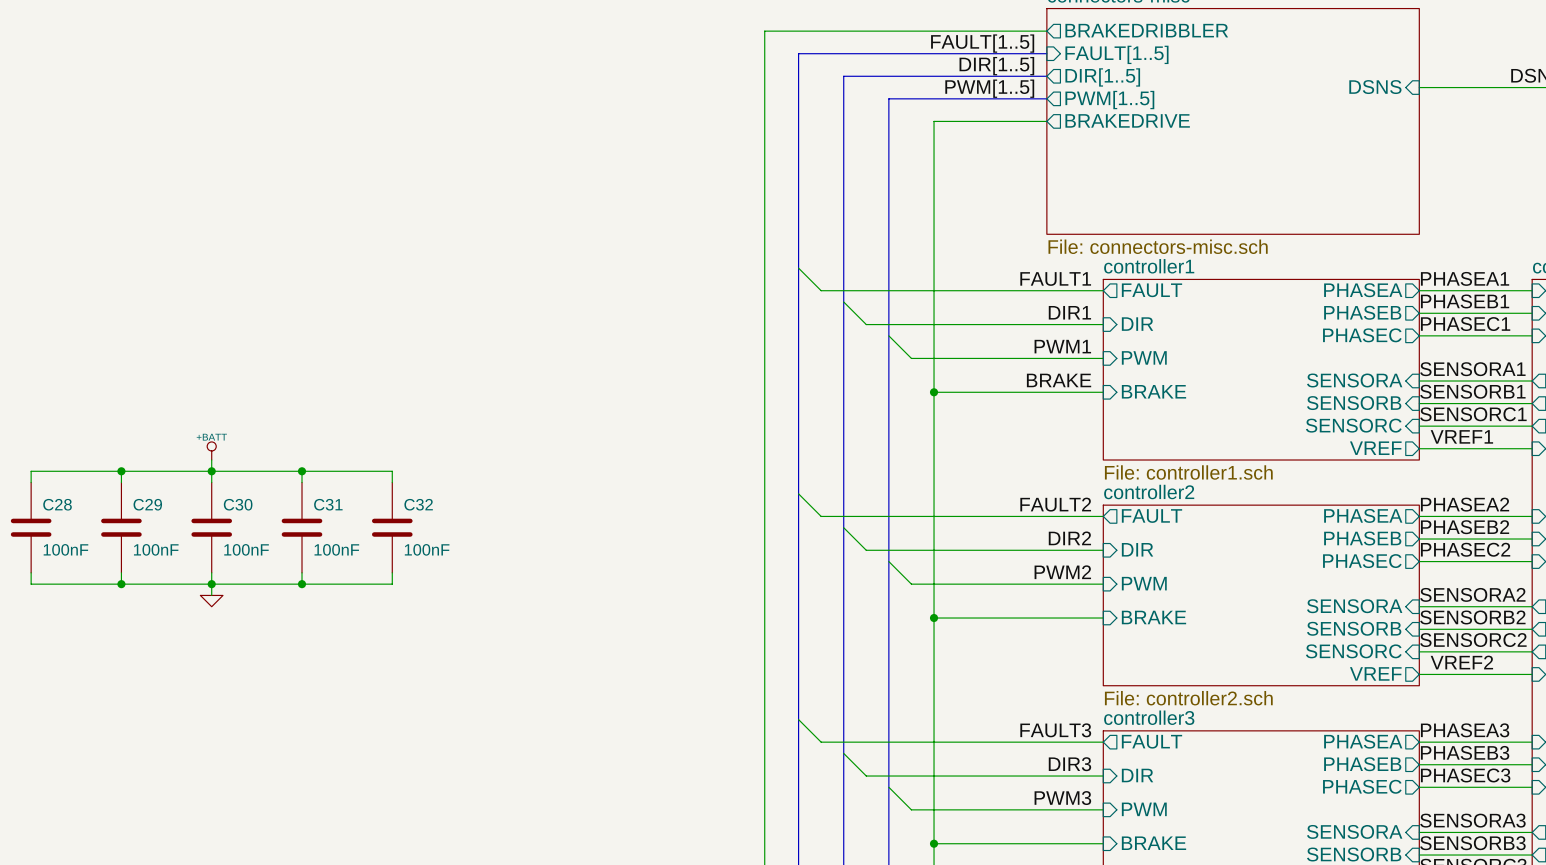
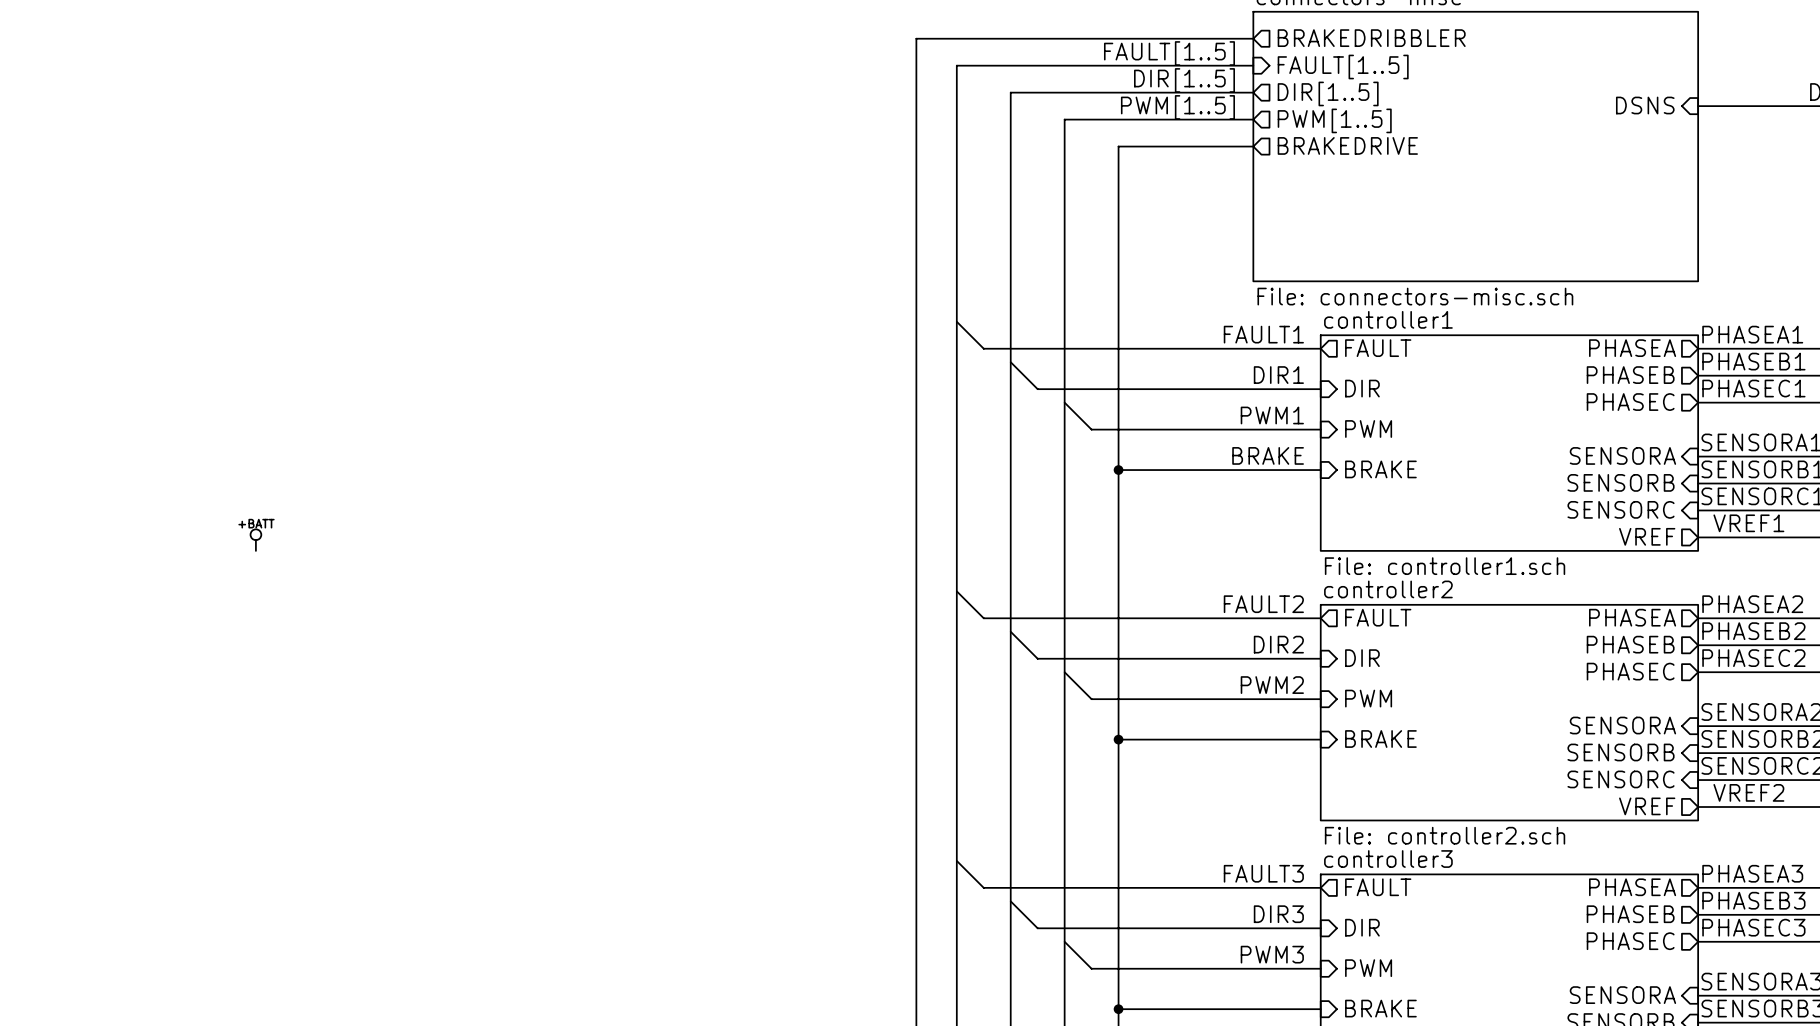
wire: (211, 460) (211, 482) -> none
wire: (121, 471) (121, 482) -> none
junction: (121, 471) -> none
junction: (211, 471) -> none
wire: (302, 471) (302, 482) -> none
junction: (302, 471) -> none
wire: (31, 482) (31, 471) (392, 471) (392, 482) -> none
C28: 100nF (31, 527) -> none
C29: 100nF (121, 527) -> none
C30: 100nF (211, 527) -> none
C31: 100nF (302, 527) -> none
C32: 100nF (392, 527) -> none
wire: (31, 572) (31, 584) (392, 584) (392, 572) -> none
wire: (121, 572) (121, 584) -> none
wire: (211, 572) (211, 595) -> none
wire: (302, 572) (302, 584) -> none
junction: (121, 584) -> none
junction: (211, 584) -> none
junction: (302, 584) -> none
power symbol: (211, 601) -> none

